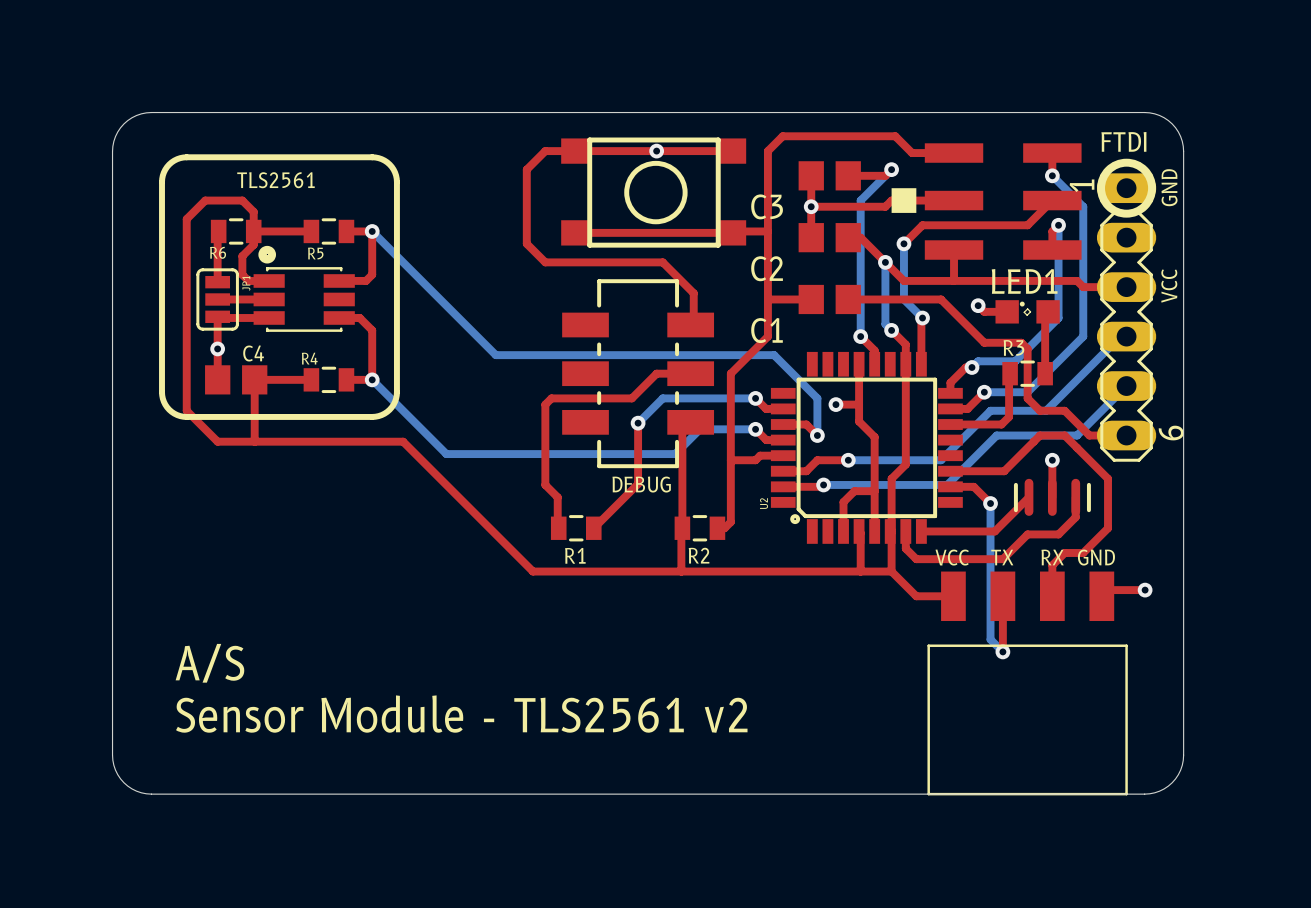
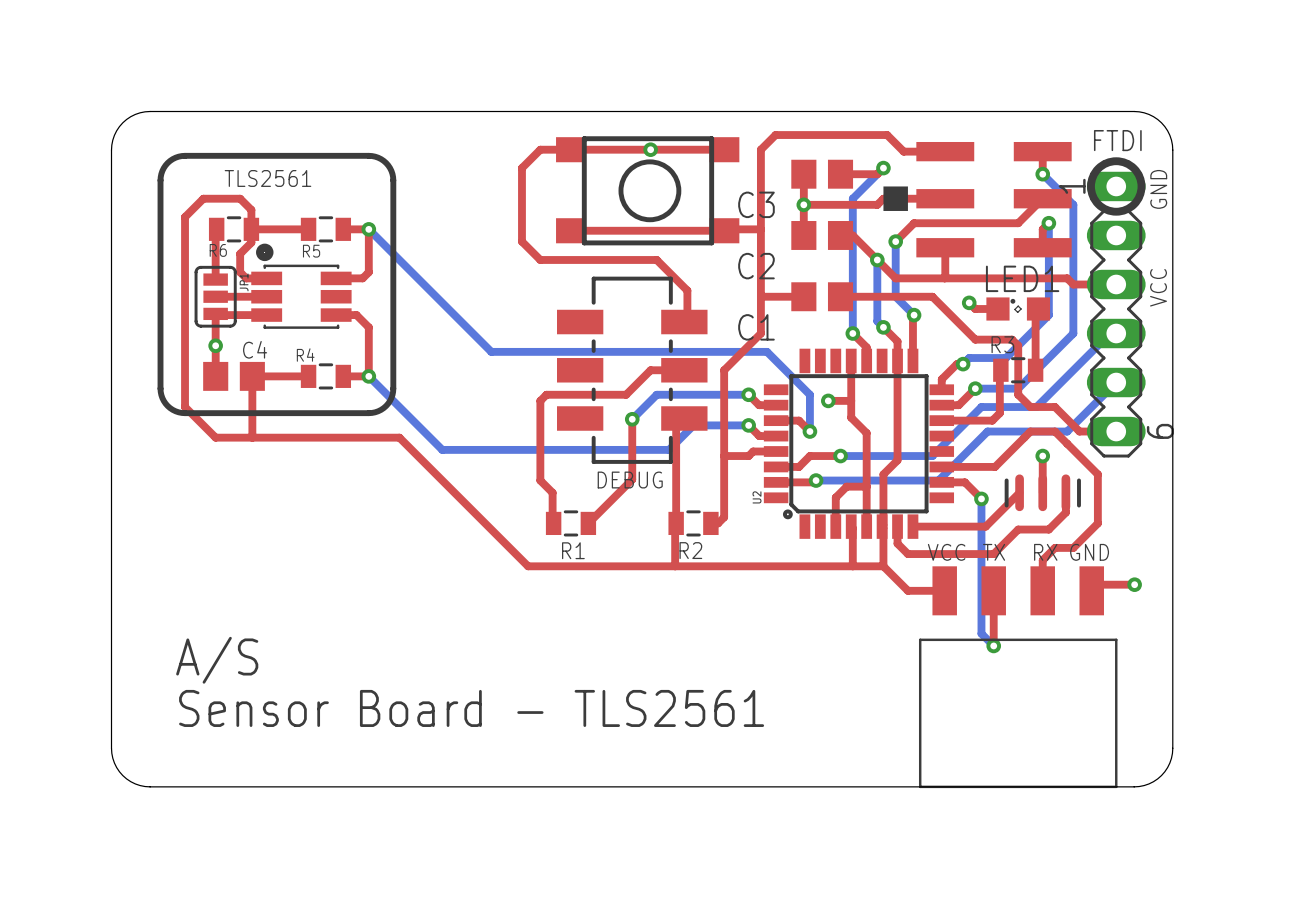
text: Sensor Module - TLS2561 v2 (461, 714) -> Sensor Board - TLS2561 (471, 708)

